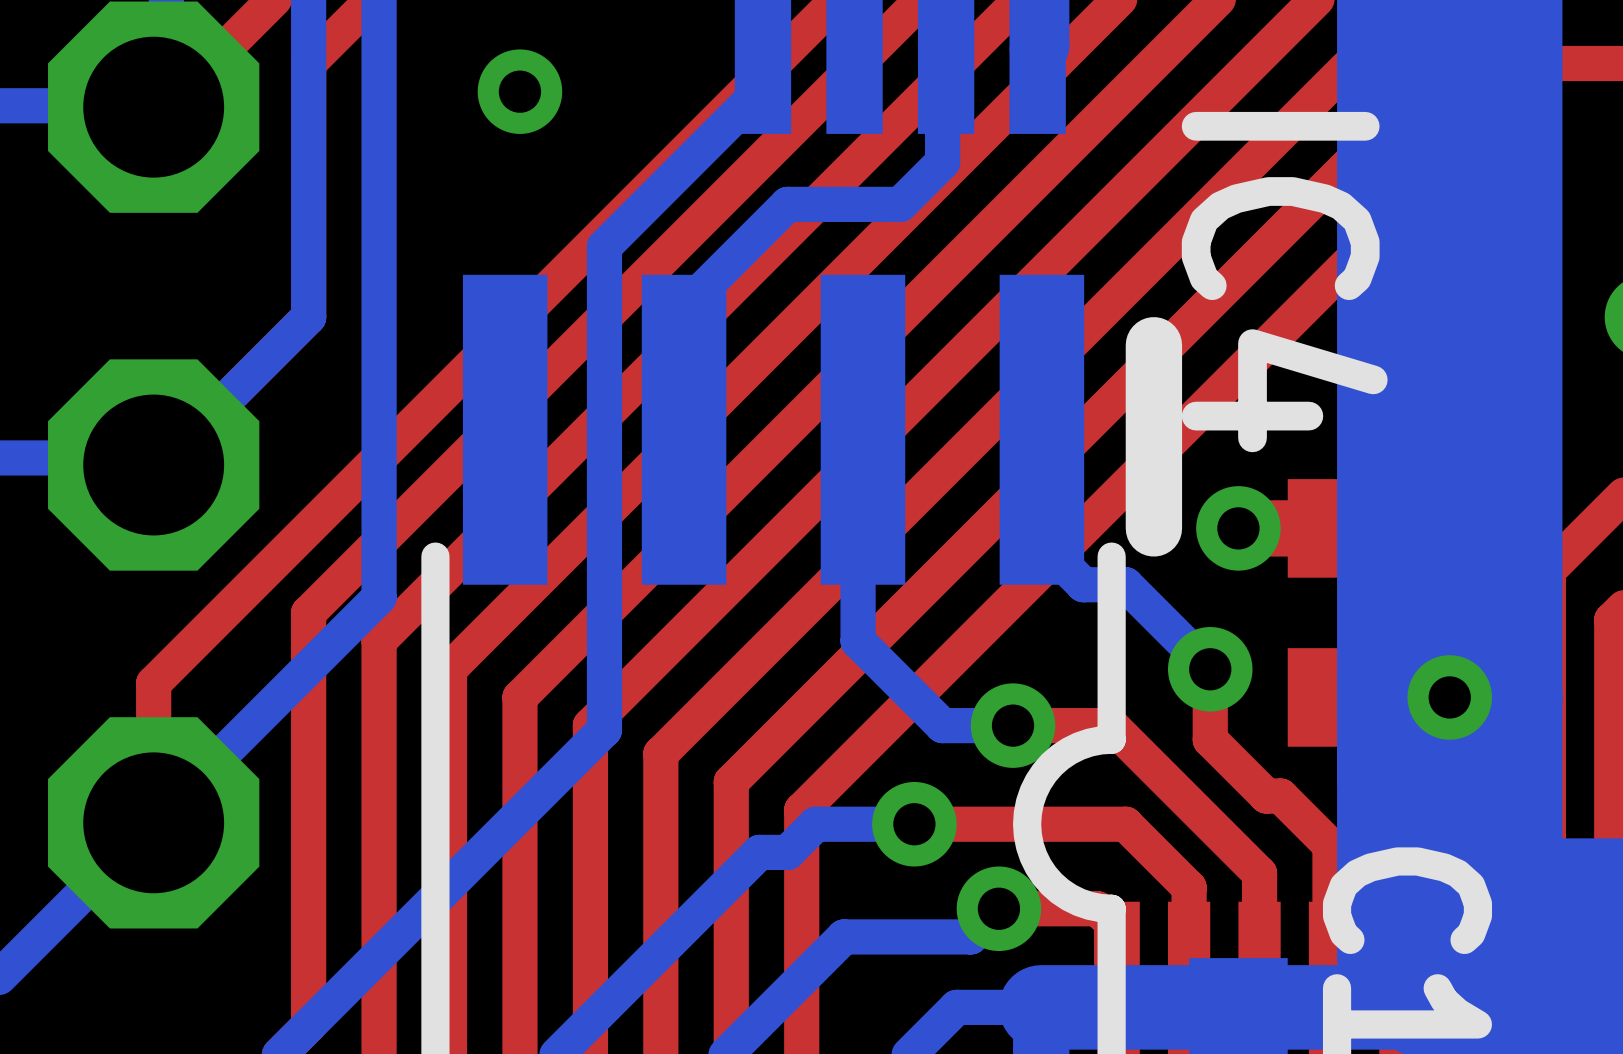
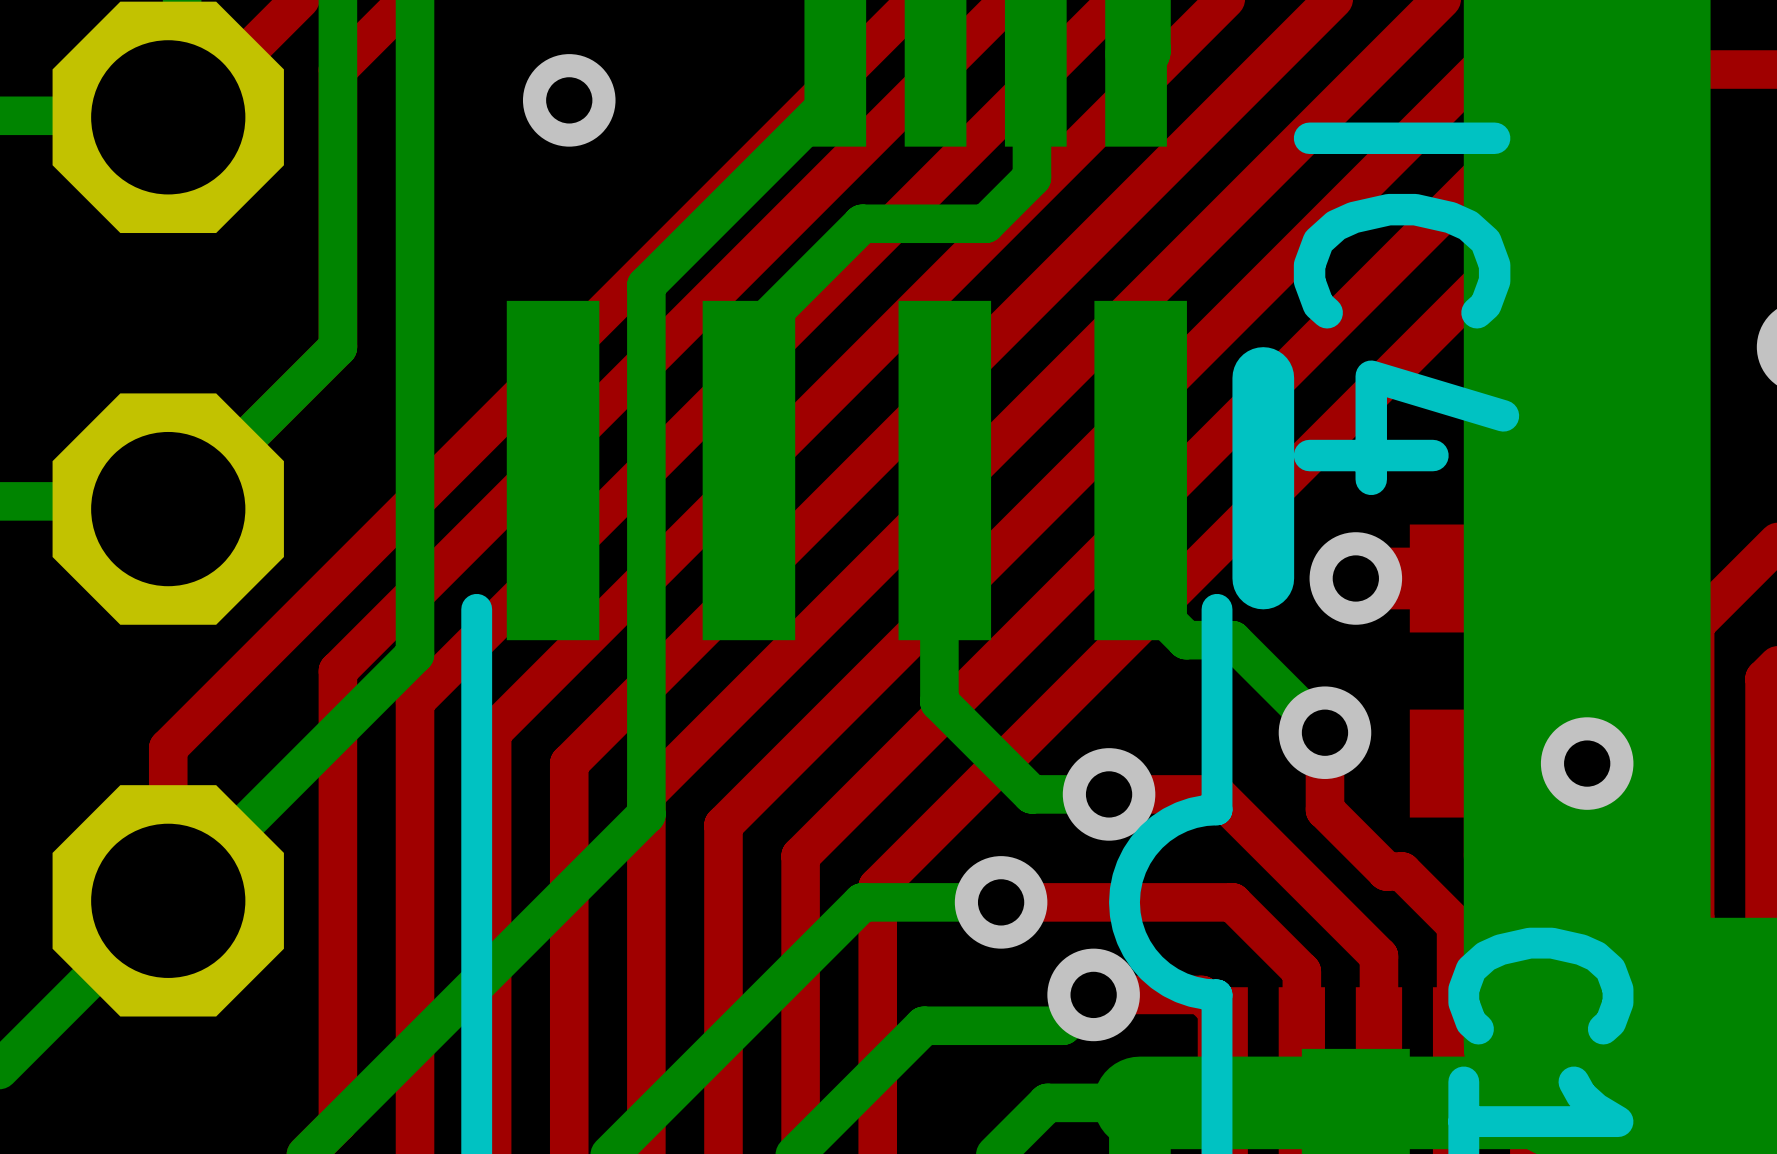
bottom track: (604, 246) (604, 729) (590, 743) -> (661, 270) (646, 285) (646, 814)
bottom track: (815, 824) (787, 852) (759, 852) -> (893, 902) (862, 902) (831, 933)

